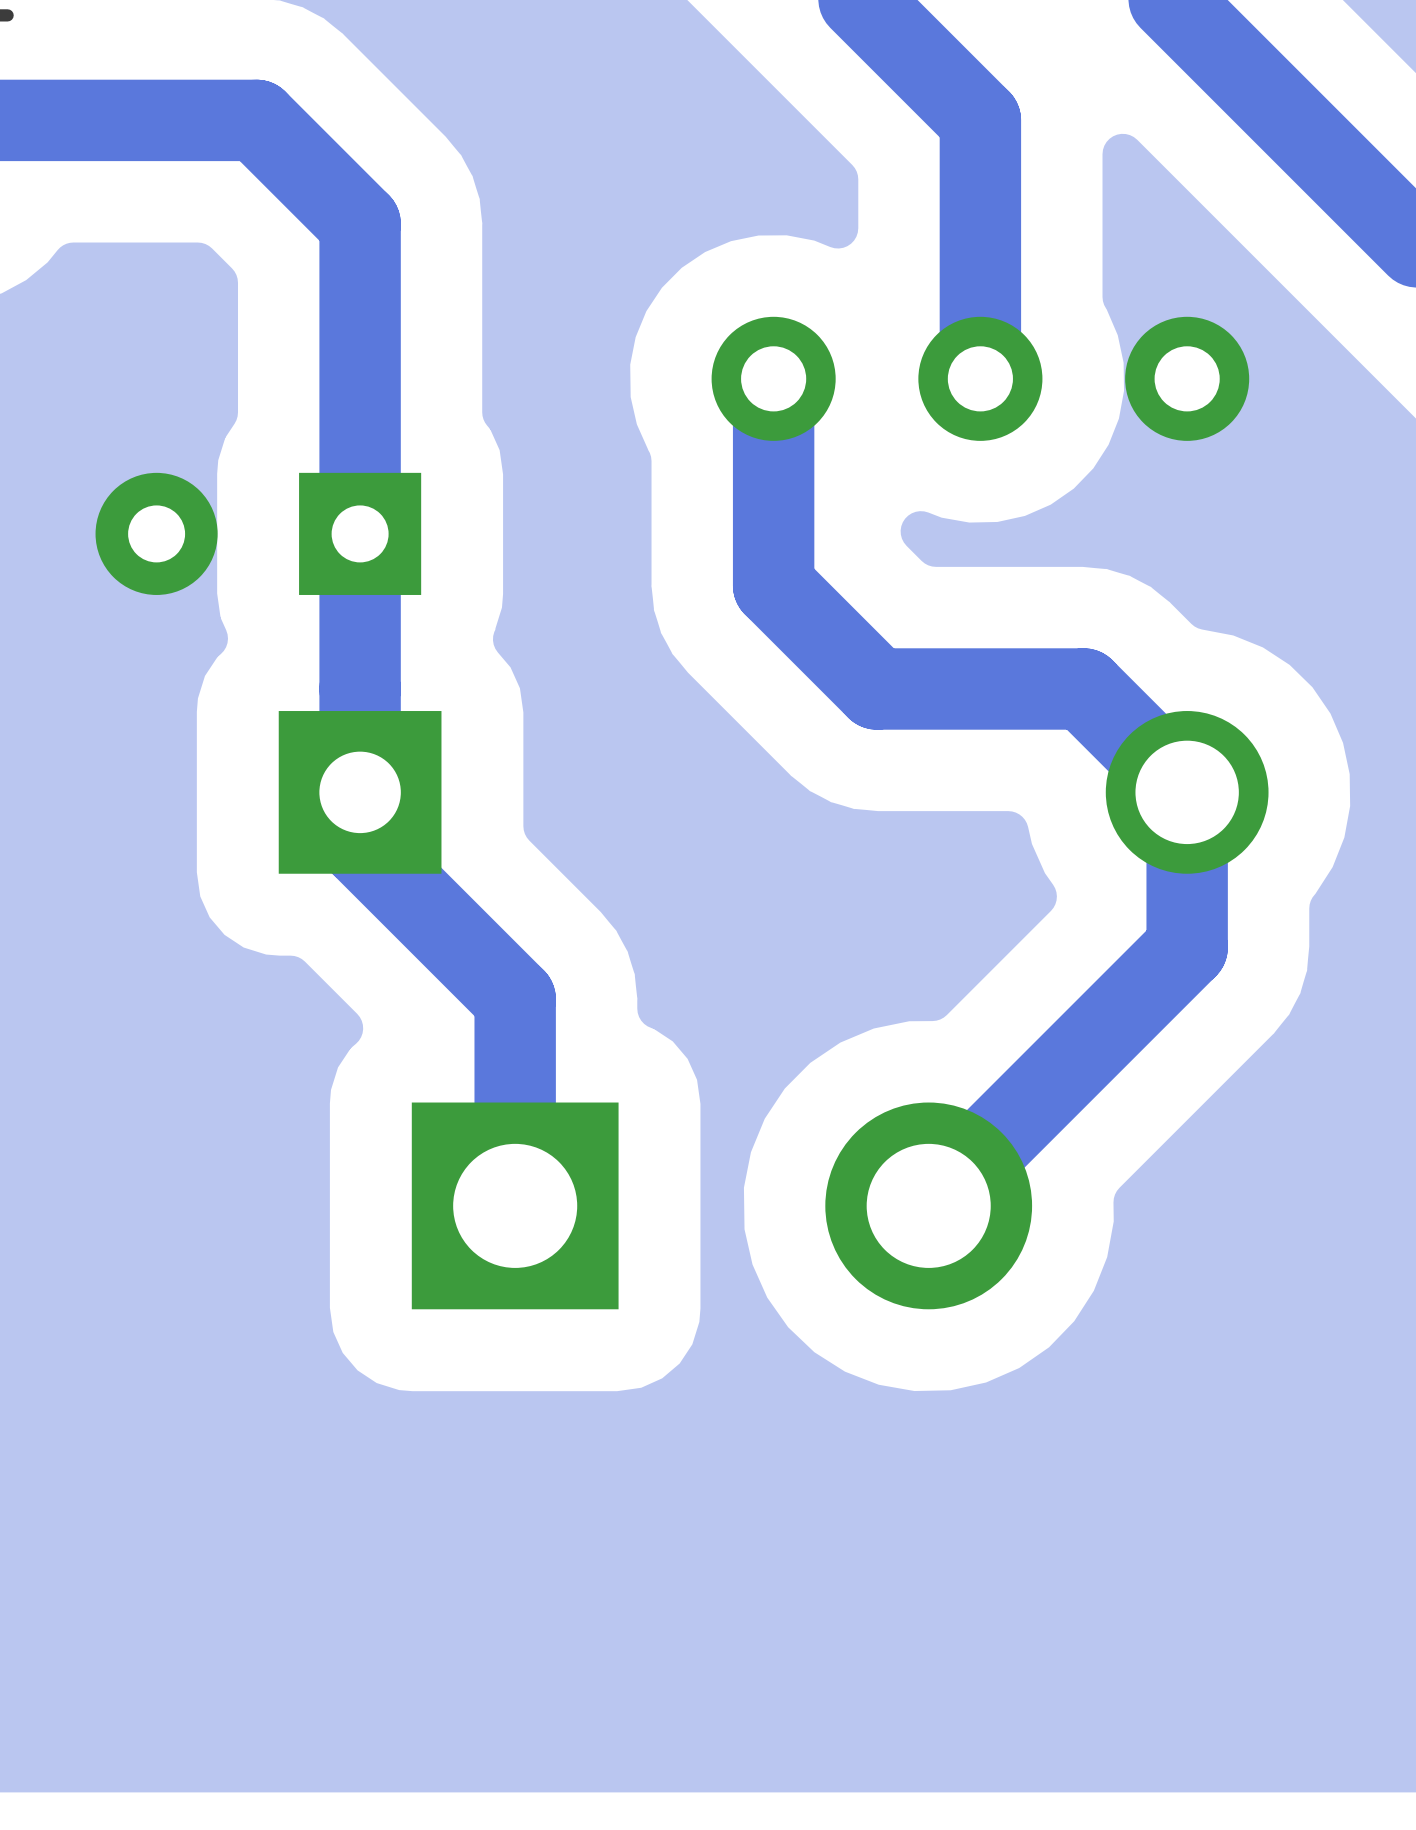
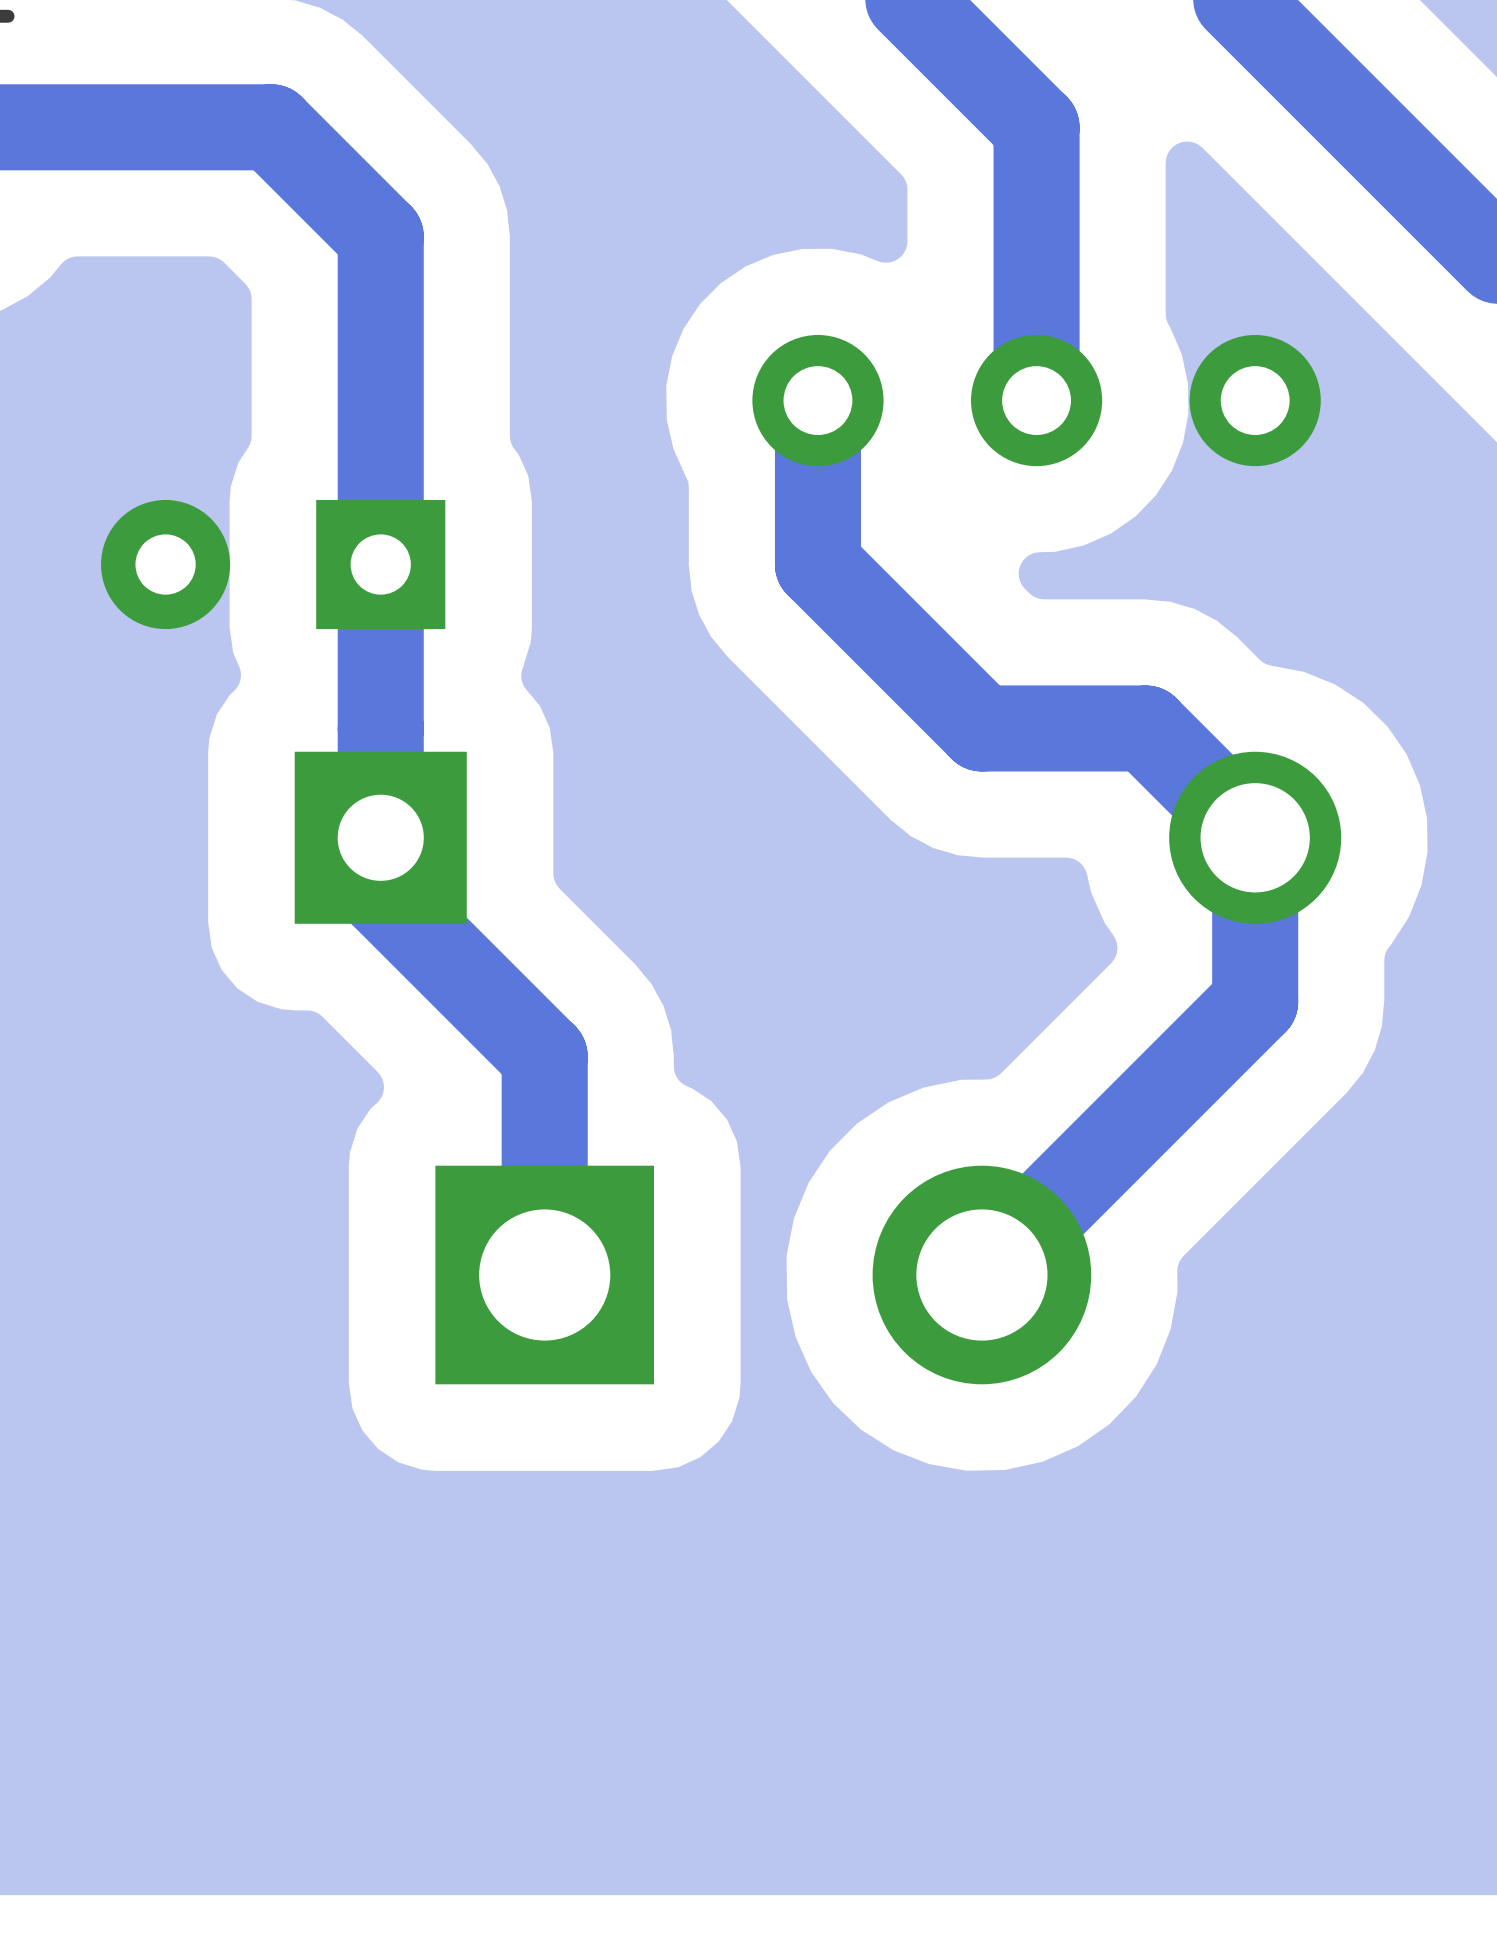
bottom track: (773, 533) (773, 585) (877, 688) (928, 688) -> (817, 564) (981, 728)

